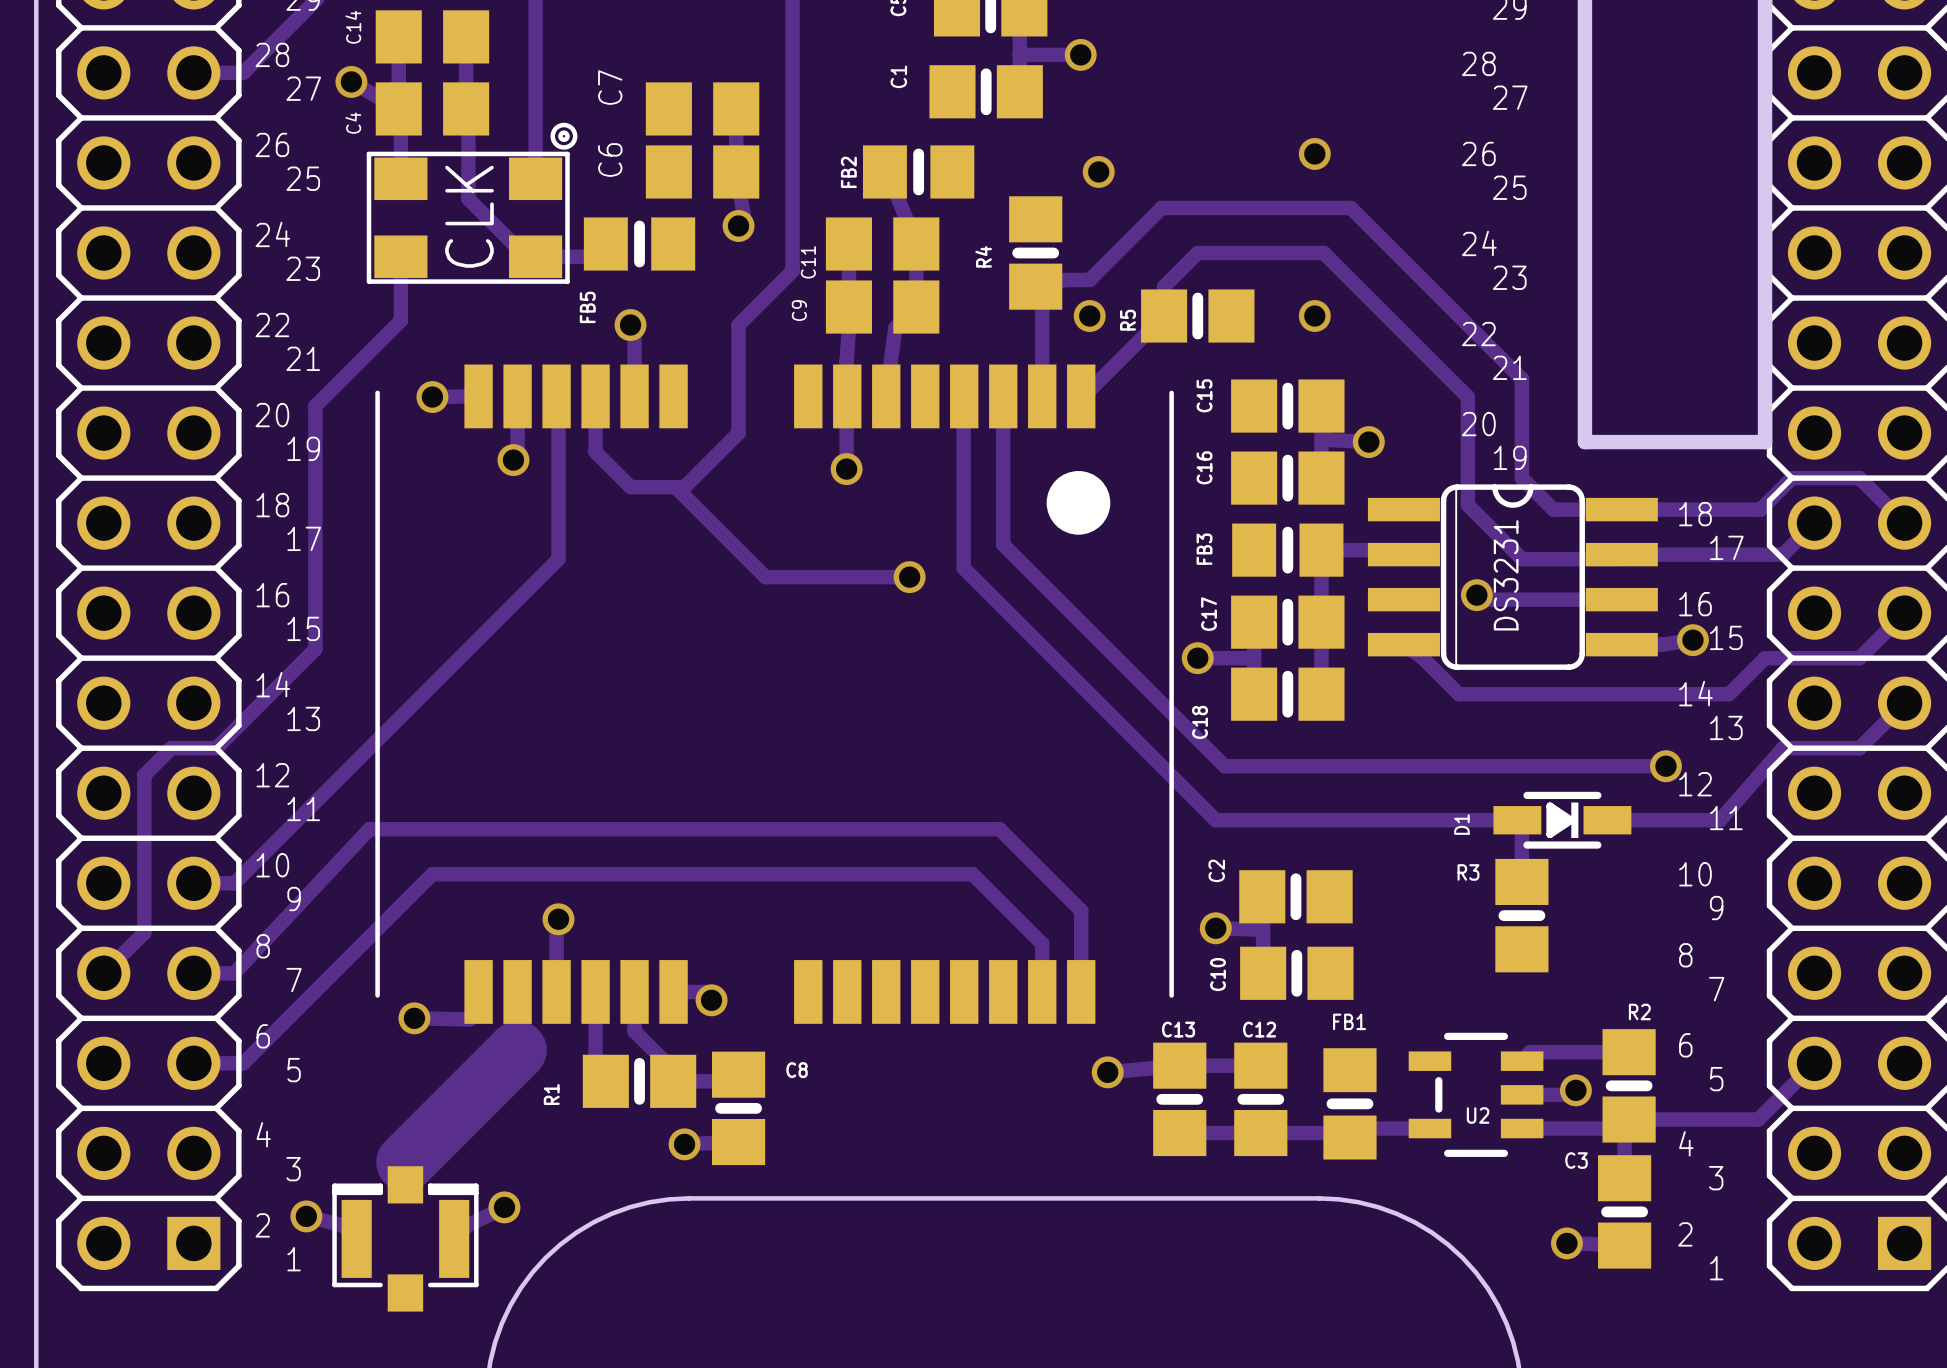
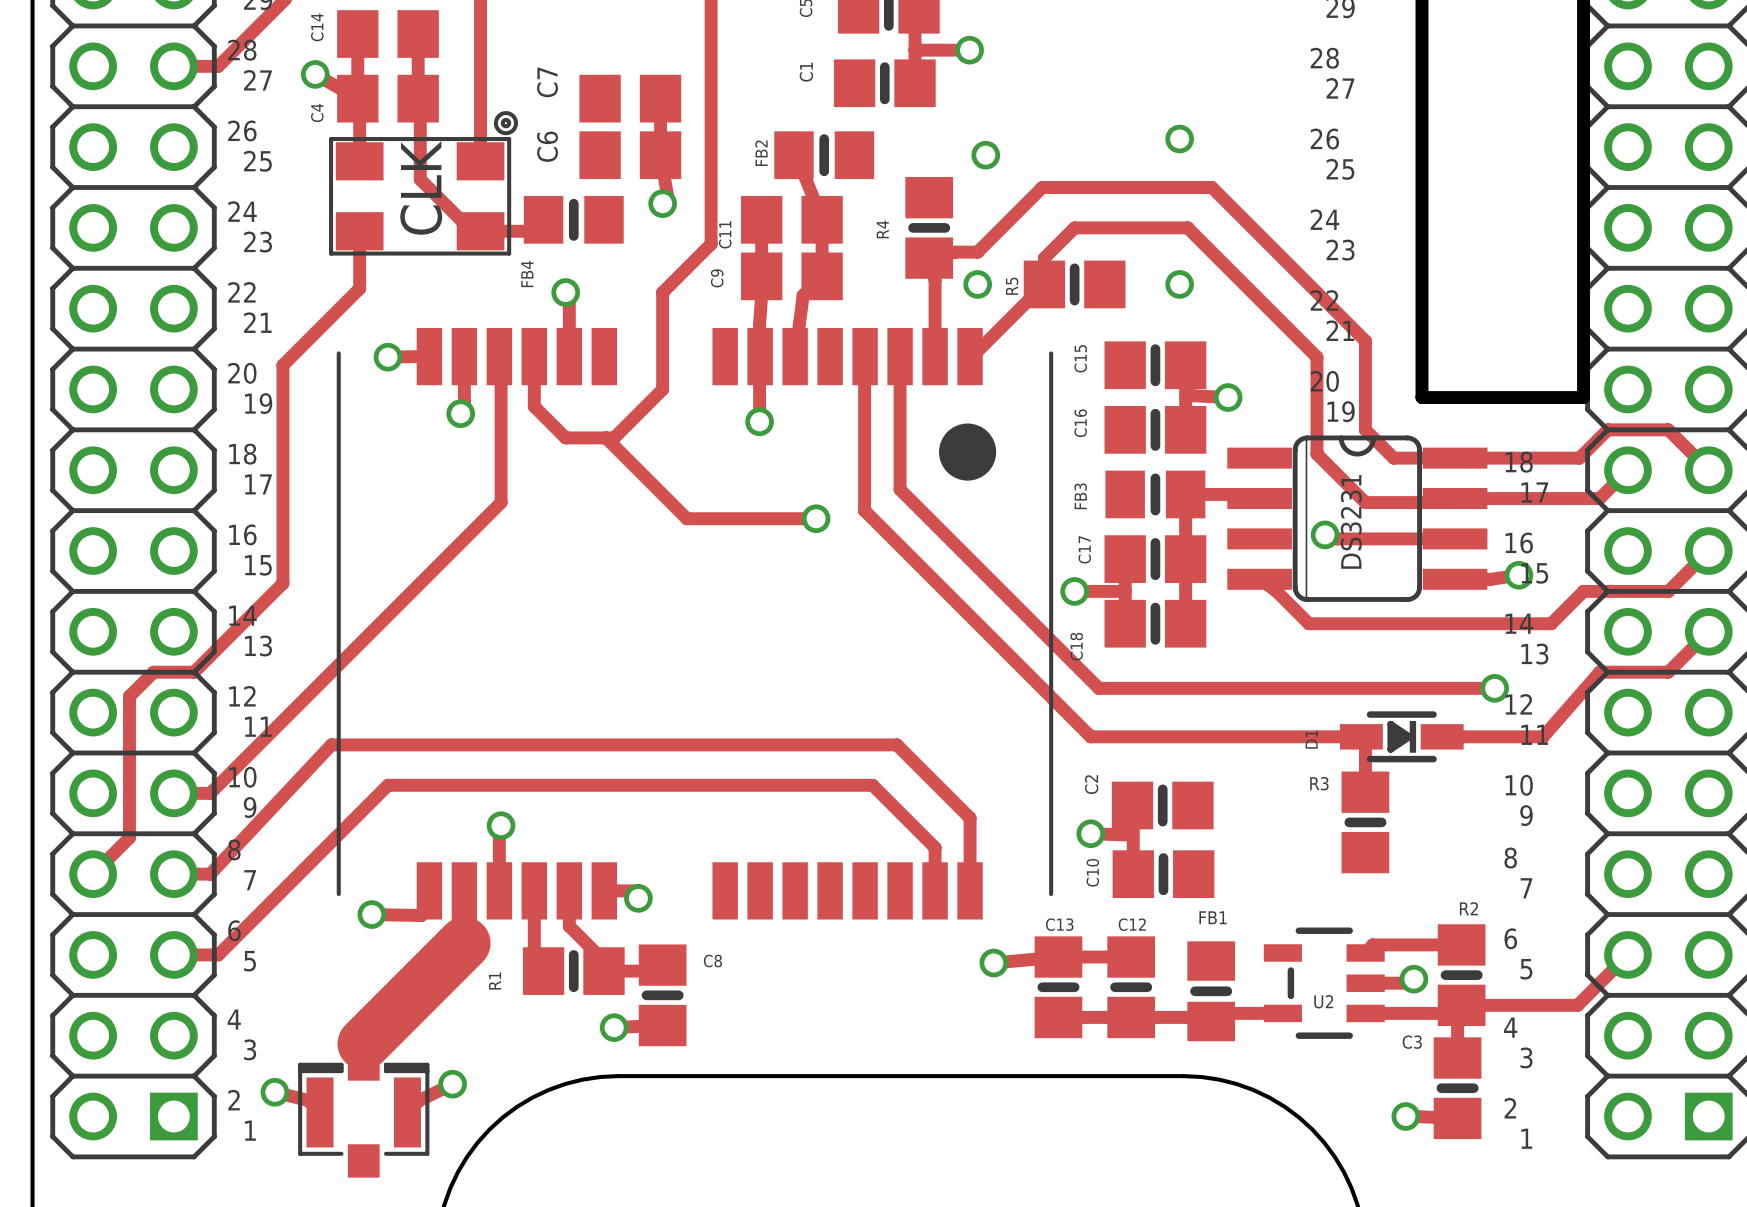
FB5 name: FB5 (587, 307) -> FB4 (527, 274)

